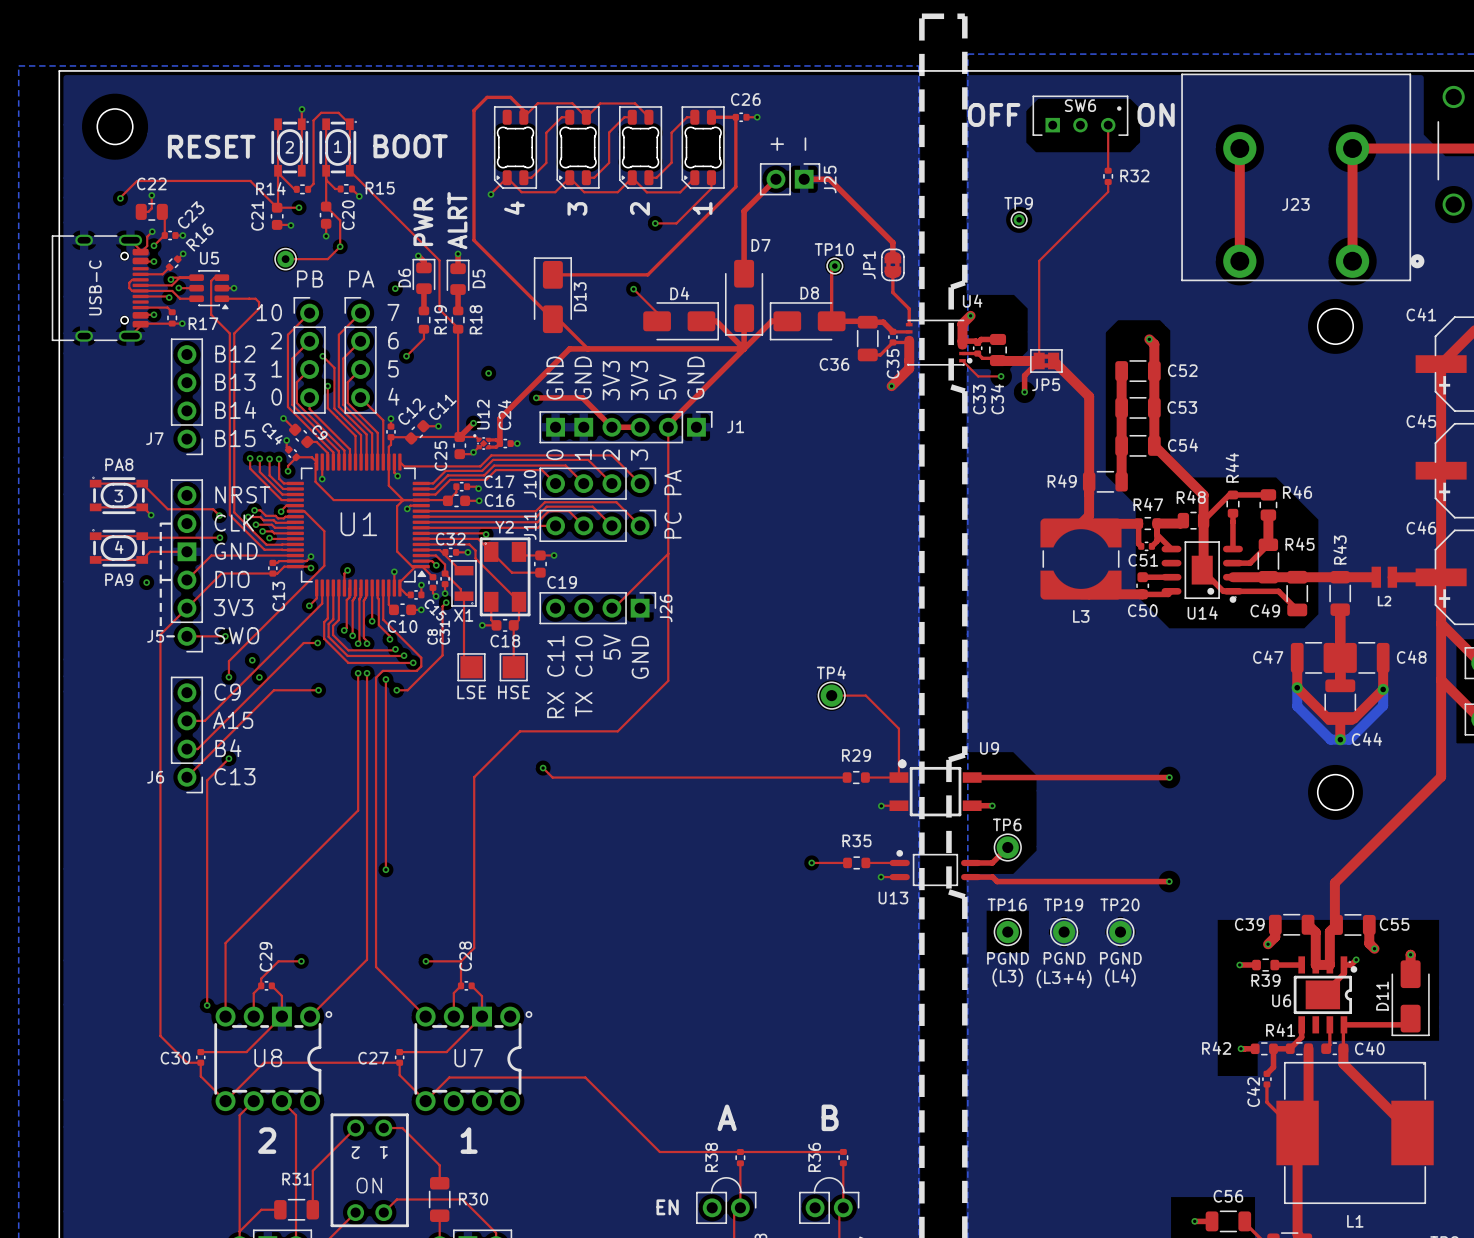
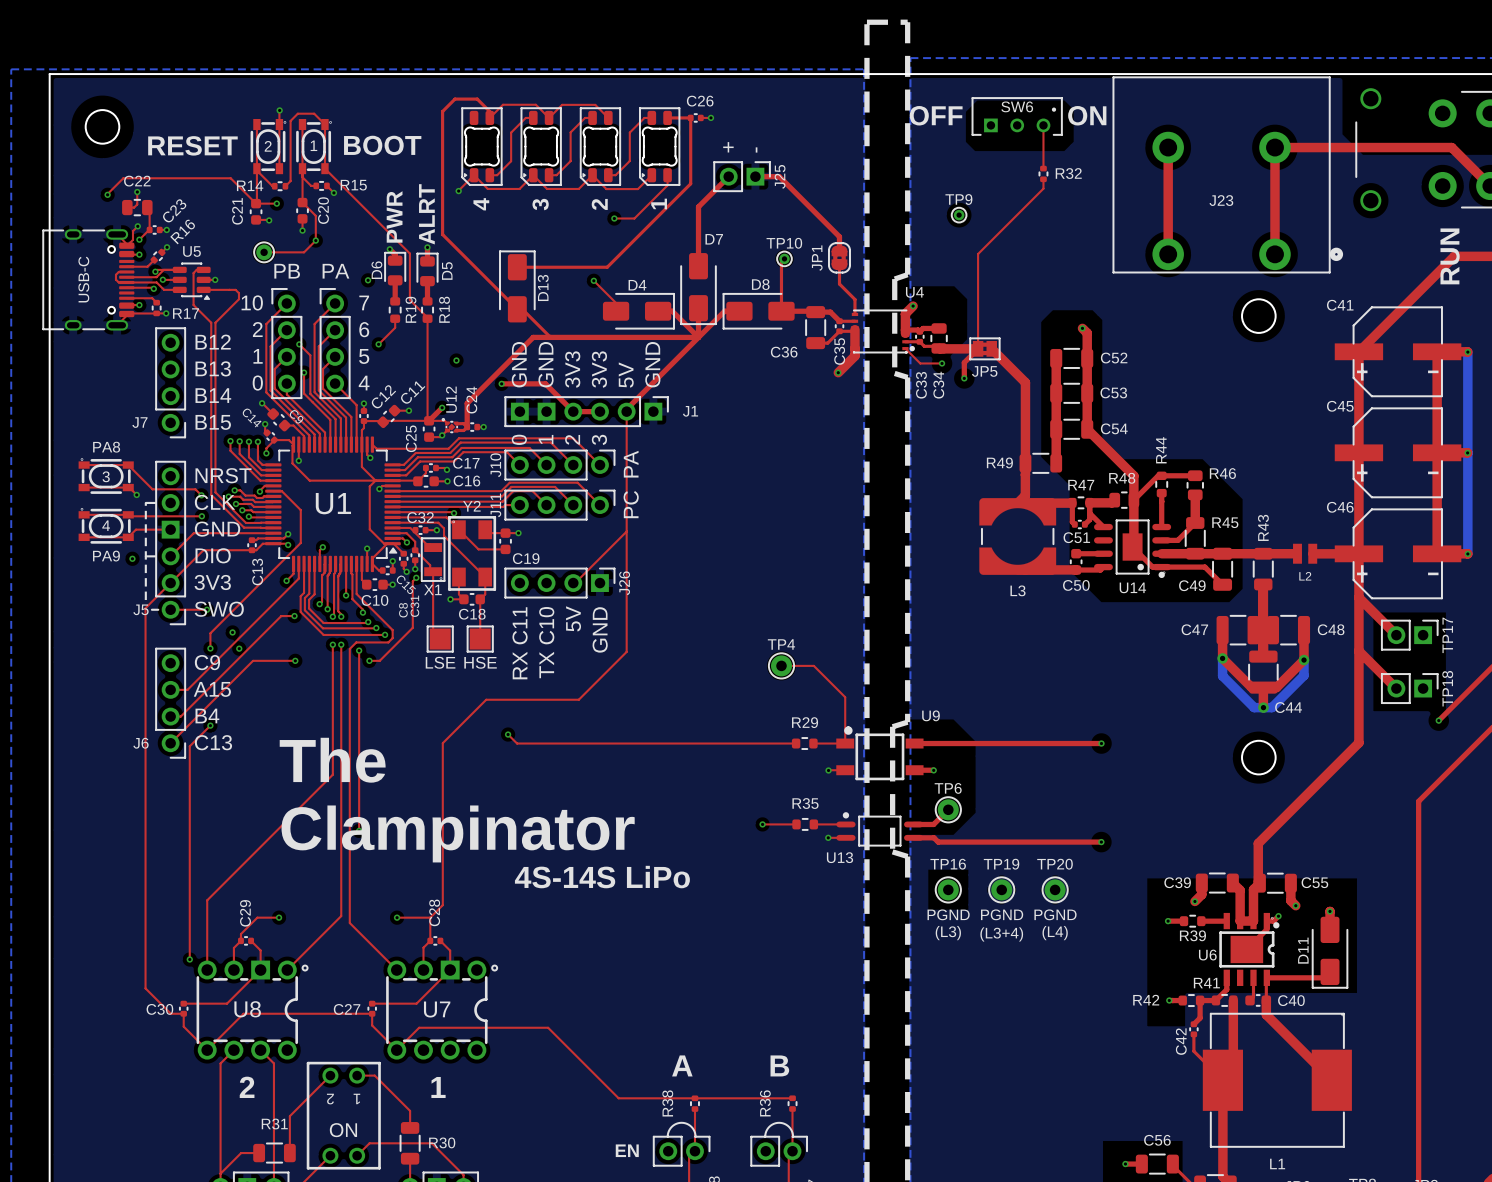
text: none -> The (332, 760)
text: none -> Clampinator (458, 833)
text: none -> 4S-14S LiPo (602, 877)

